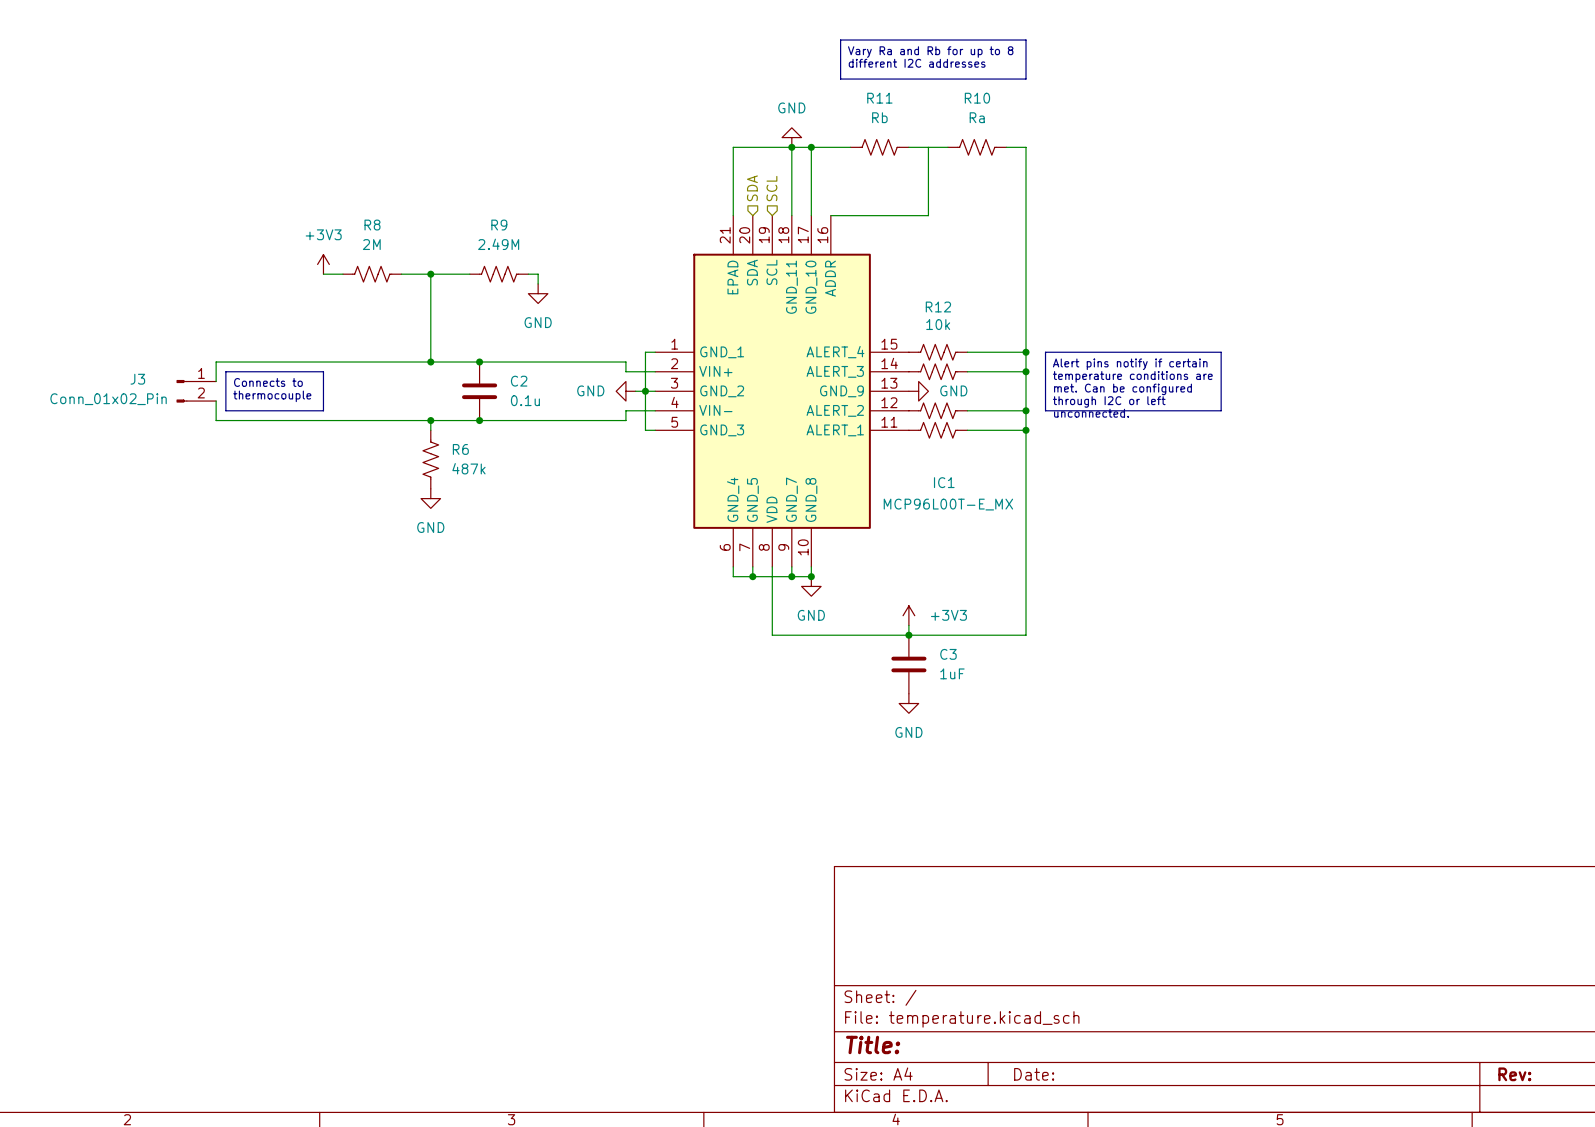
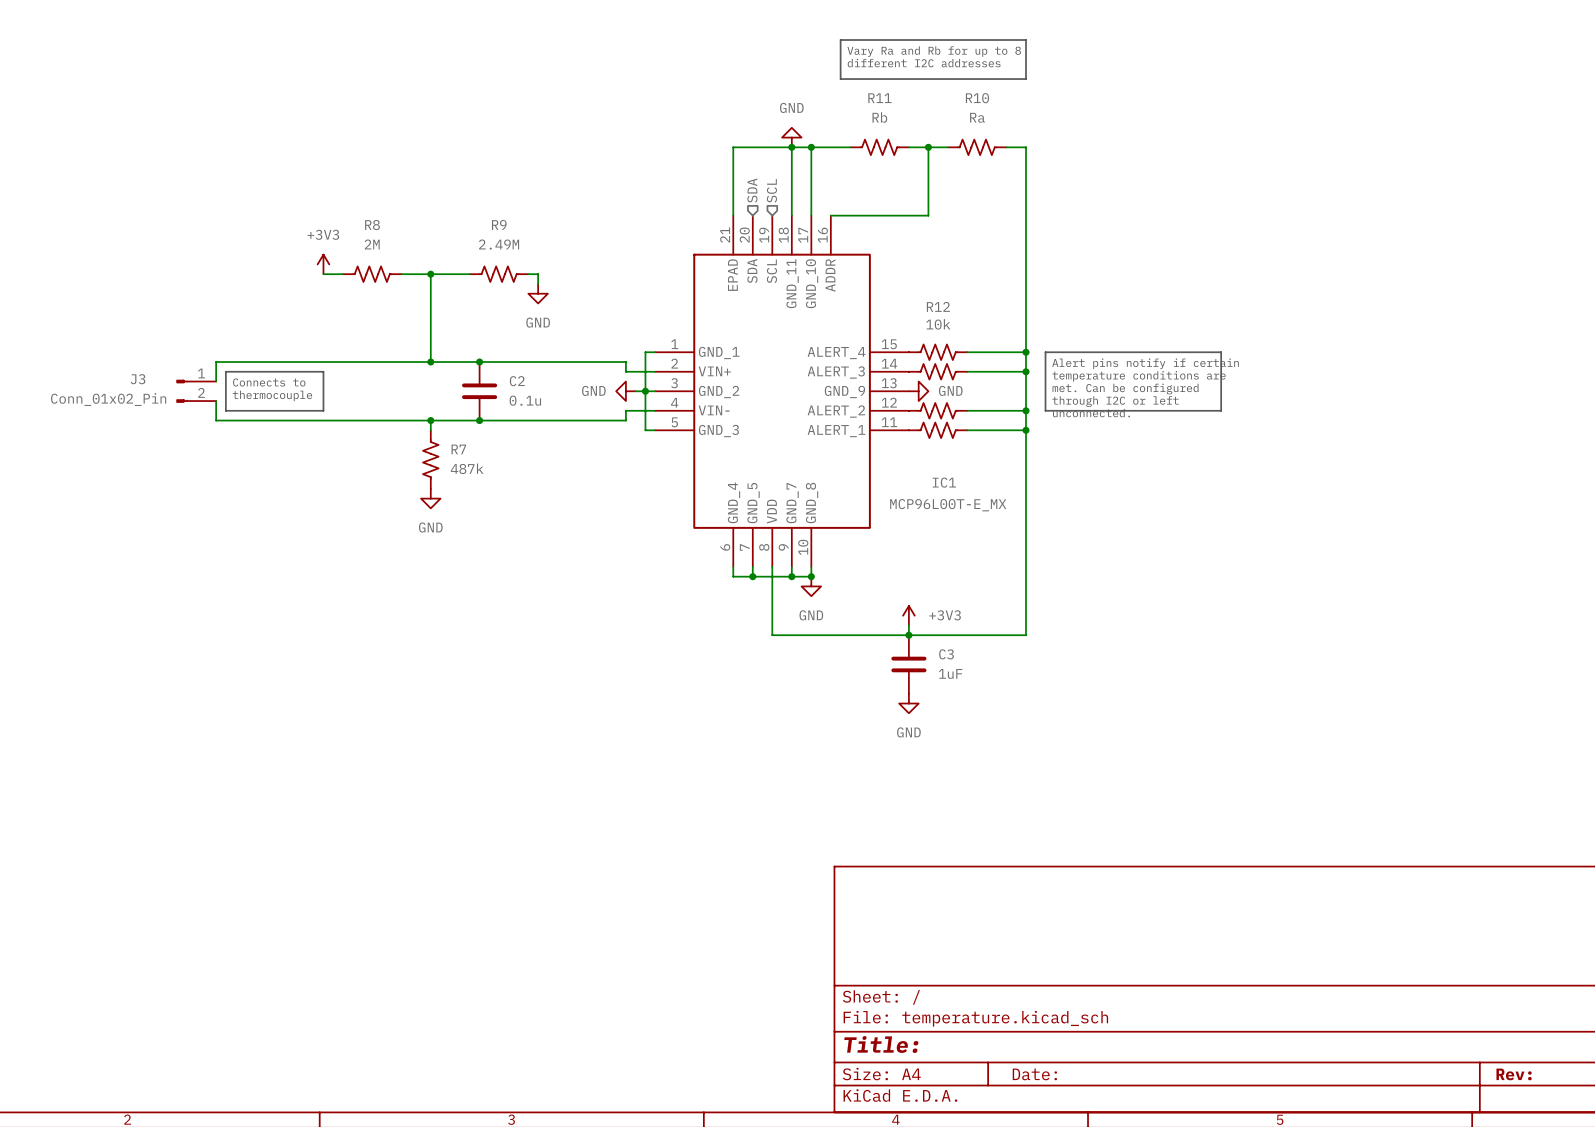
junction: none -> (928, 147)
R6 name: R6 (460, 449) -> R7 (458, 449)

